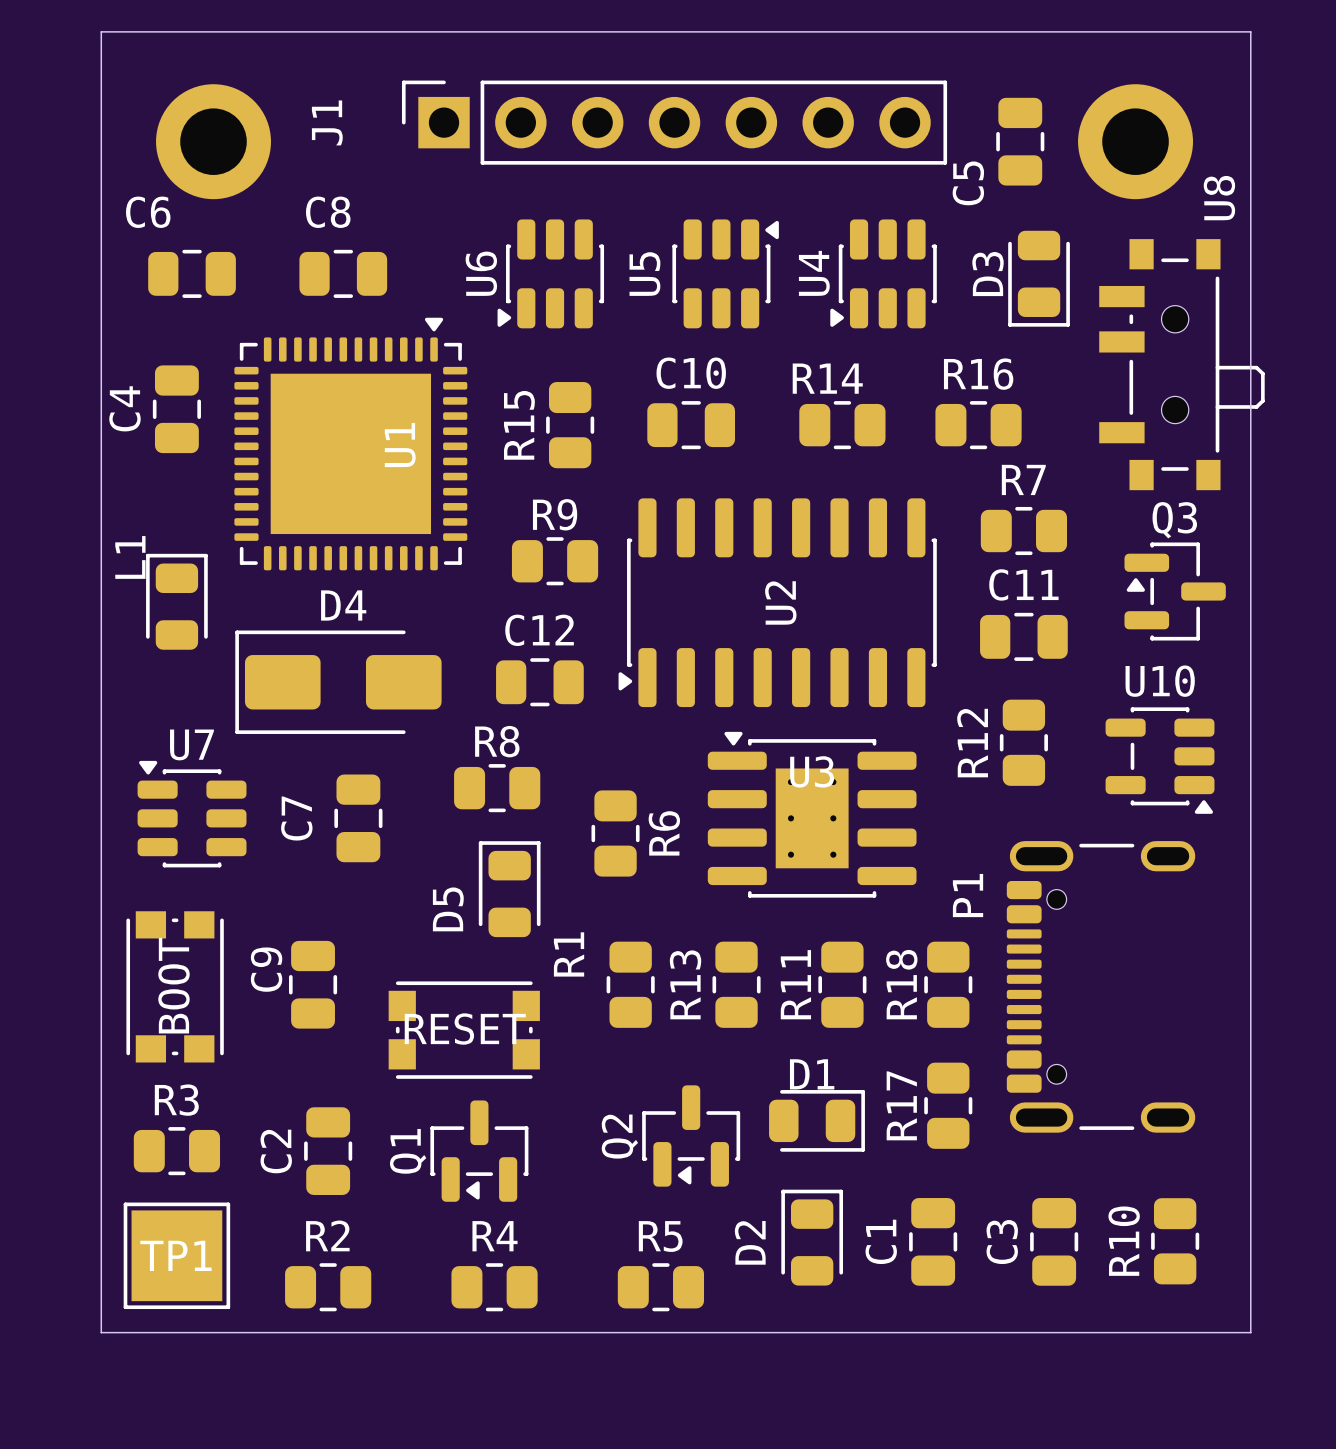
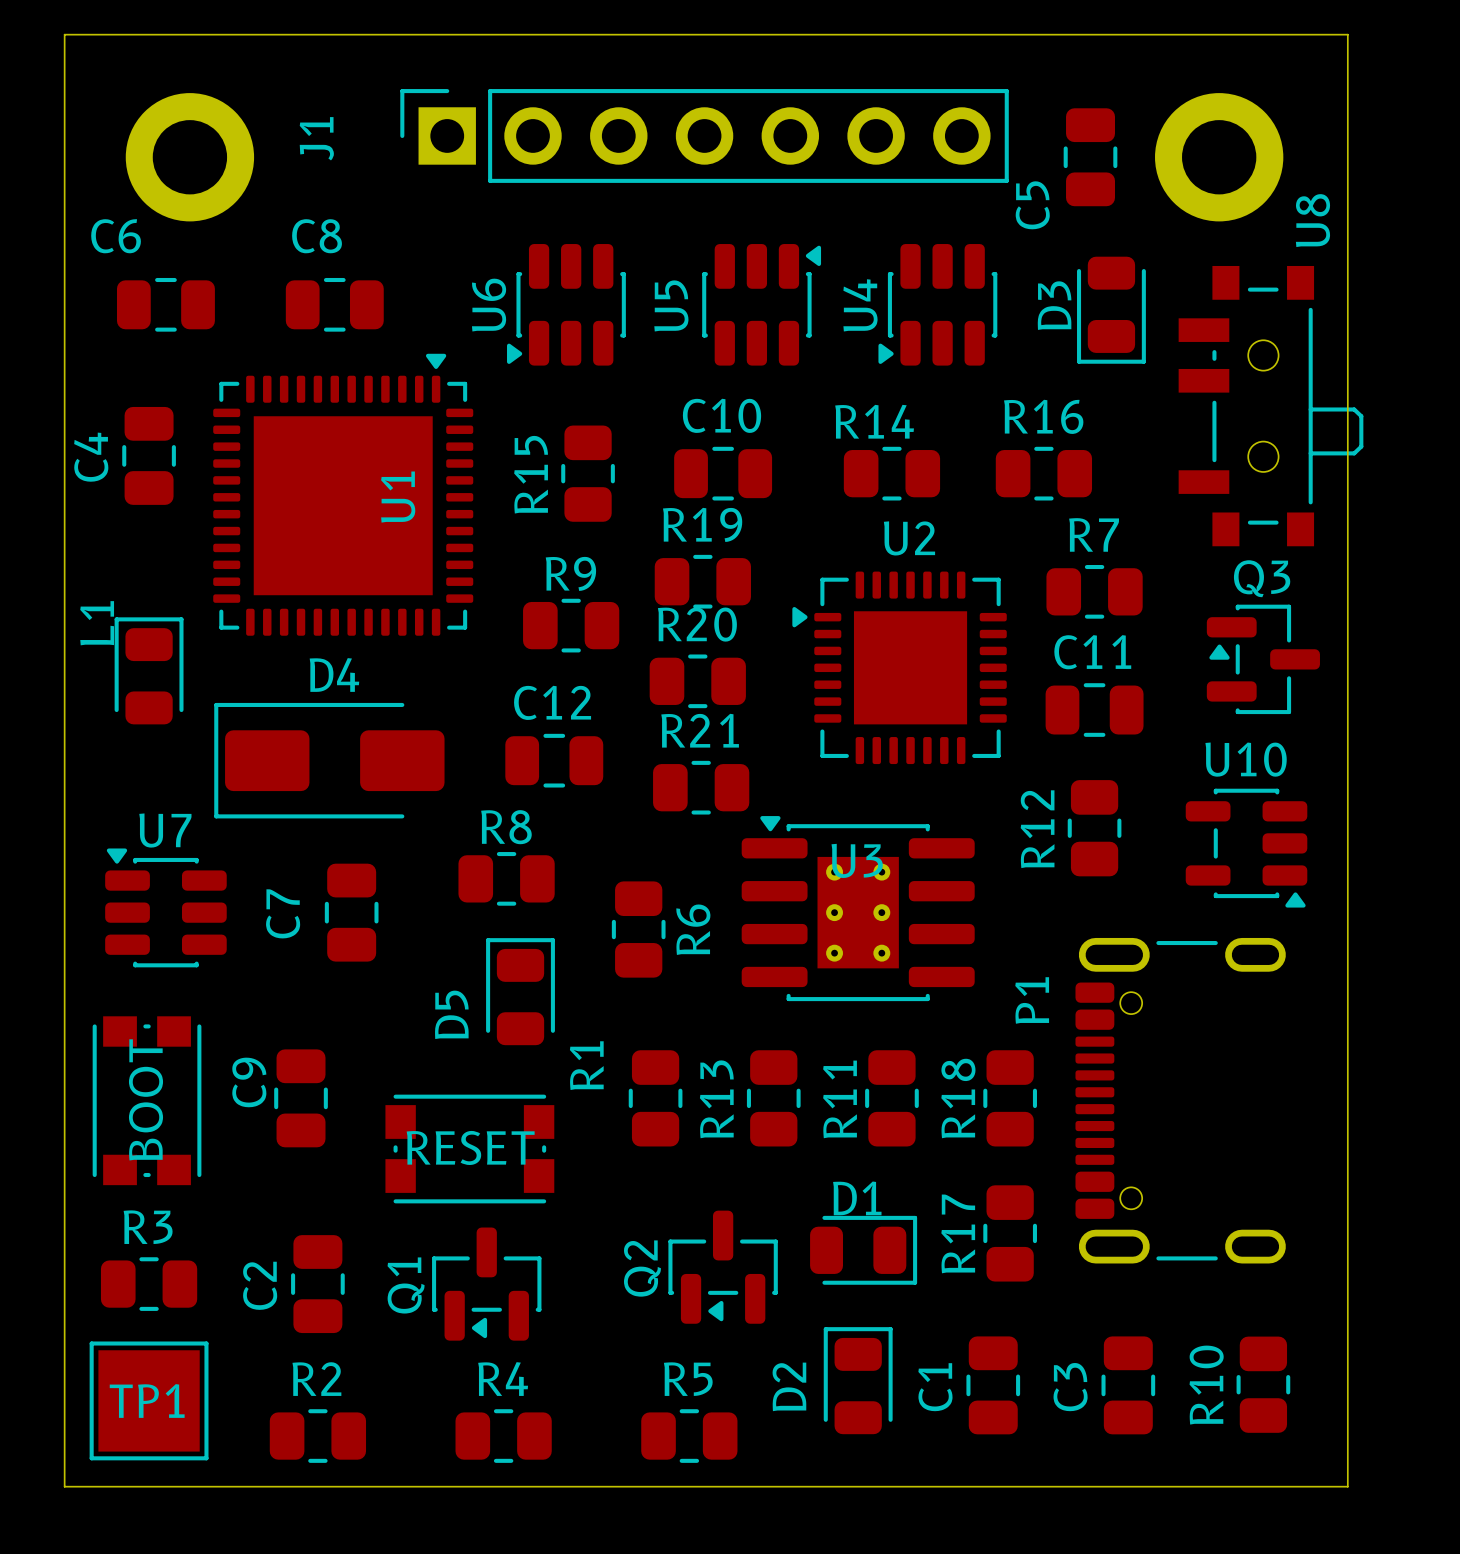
U2 footprint: [618, 498, 937, 708] -> [792, 571, 1007, 765]
R19: none -> (702, 581)
U2 name position: U2 (780, 602) -> U2 (909, 538)
R20: none -> (697, 681)
R21: none -> (701, 787)

